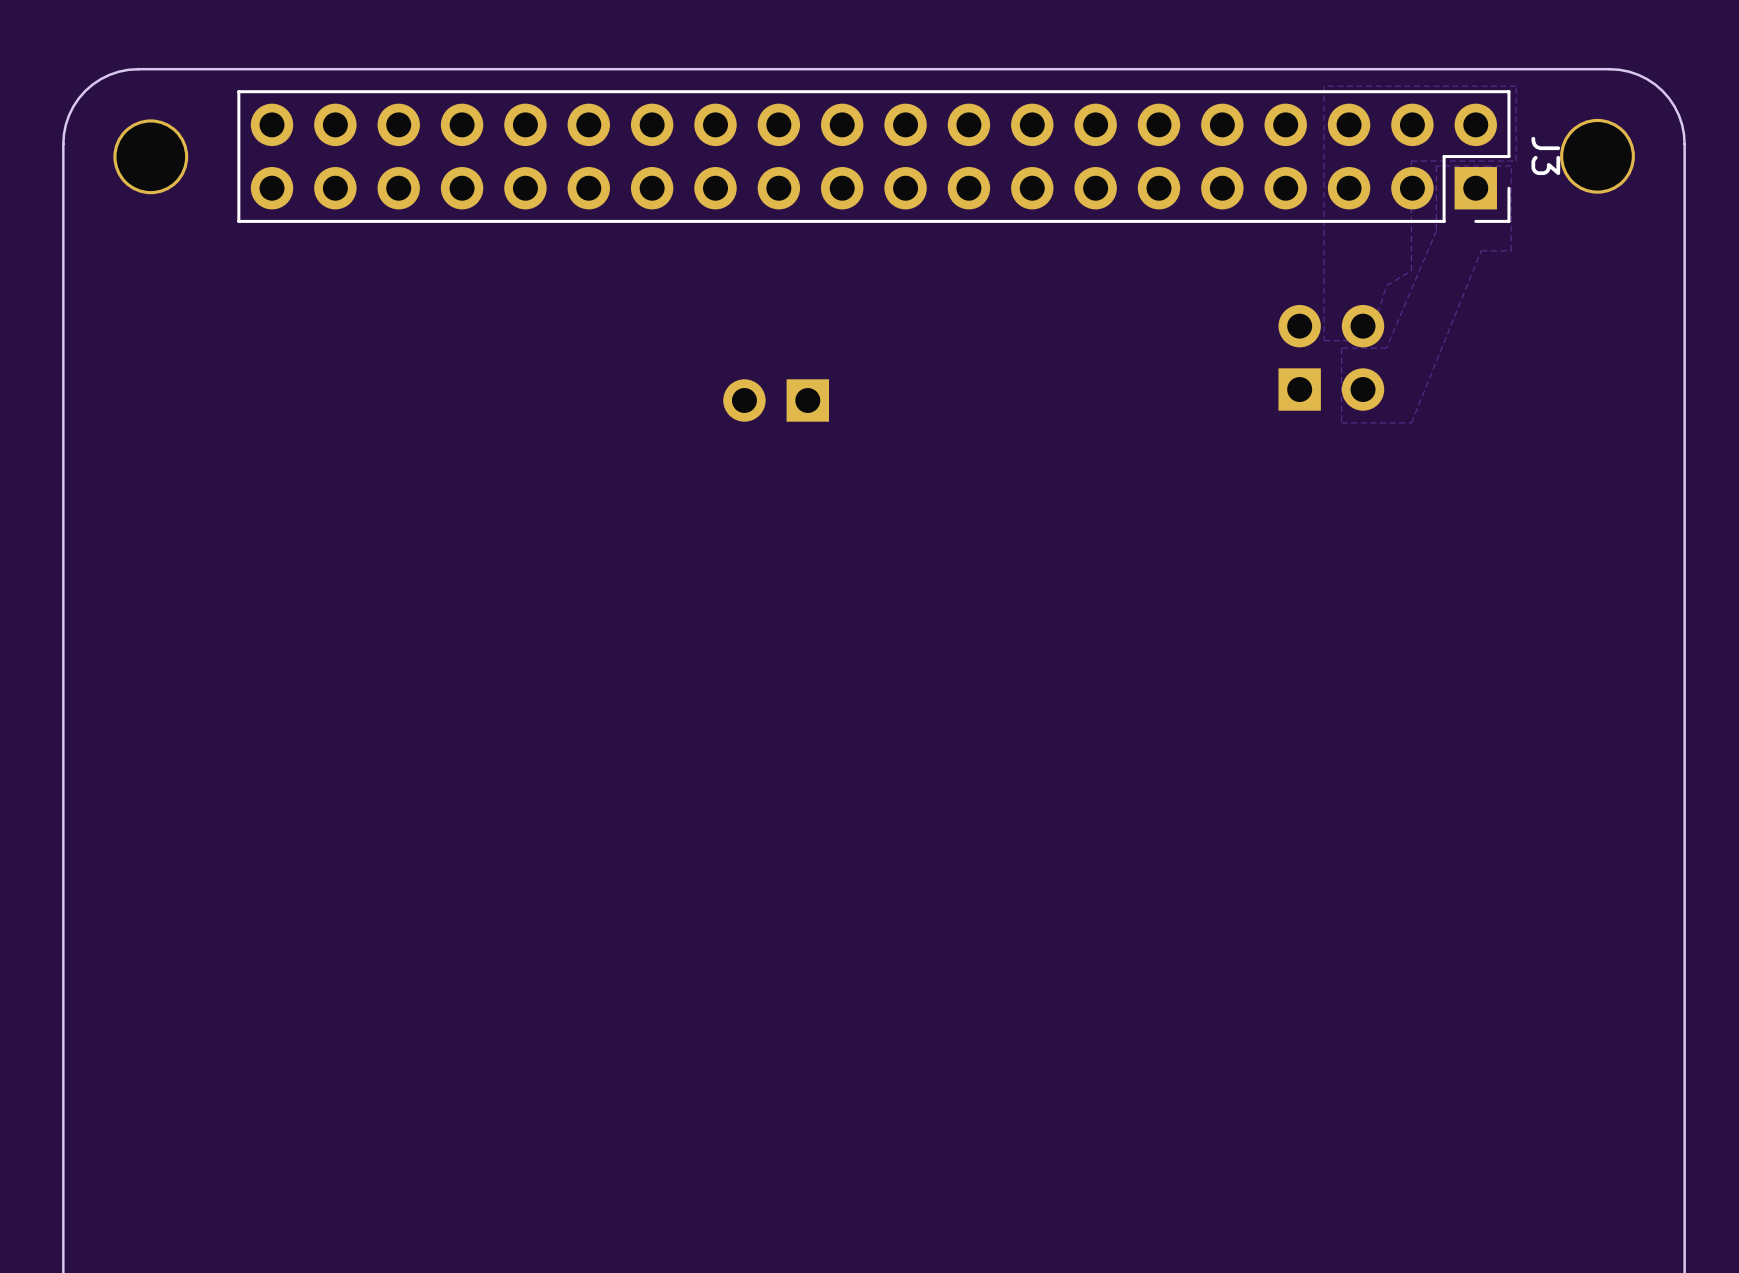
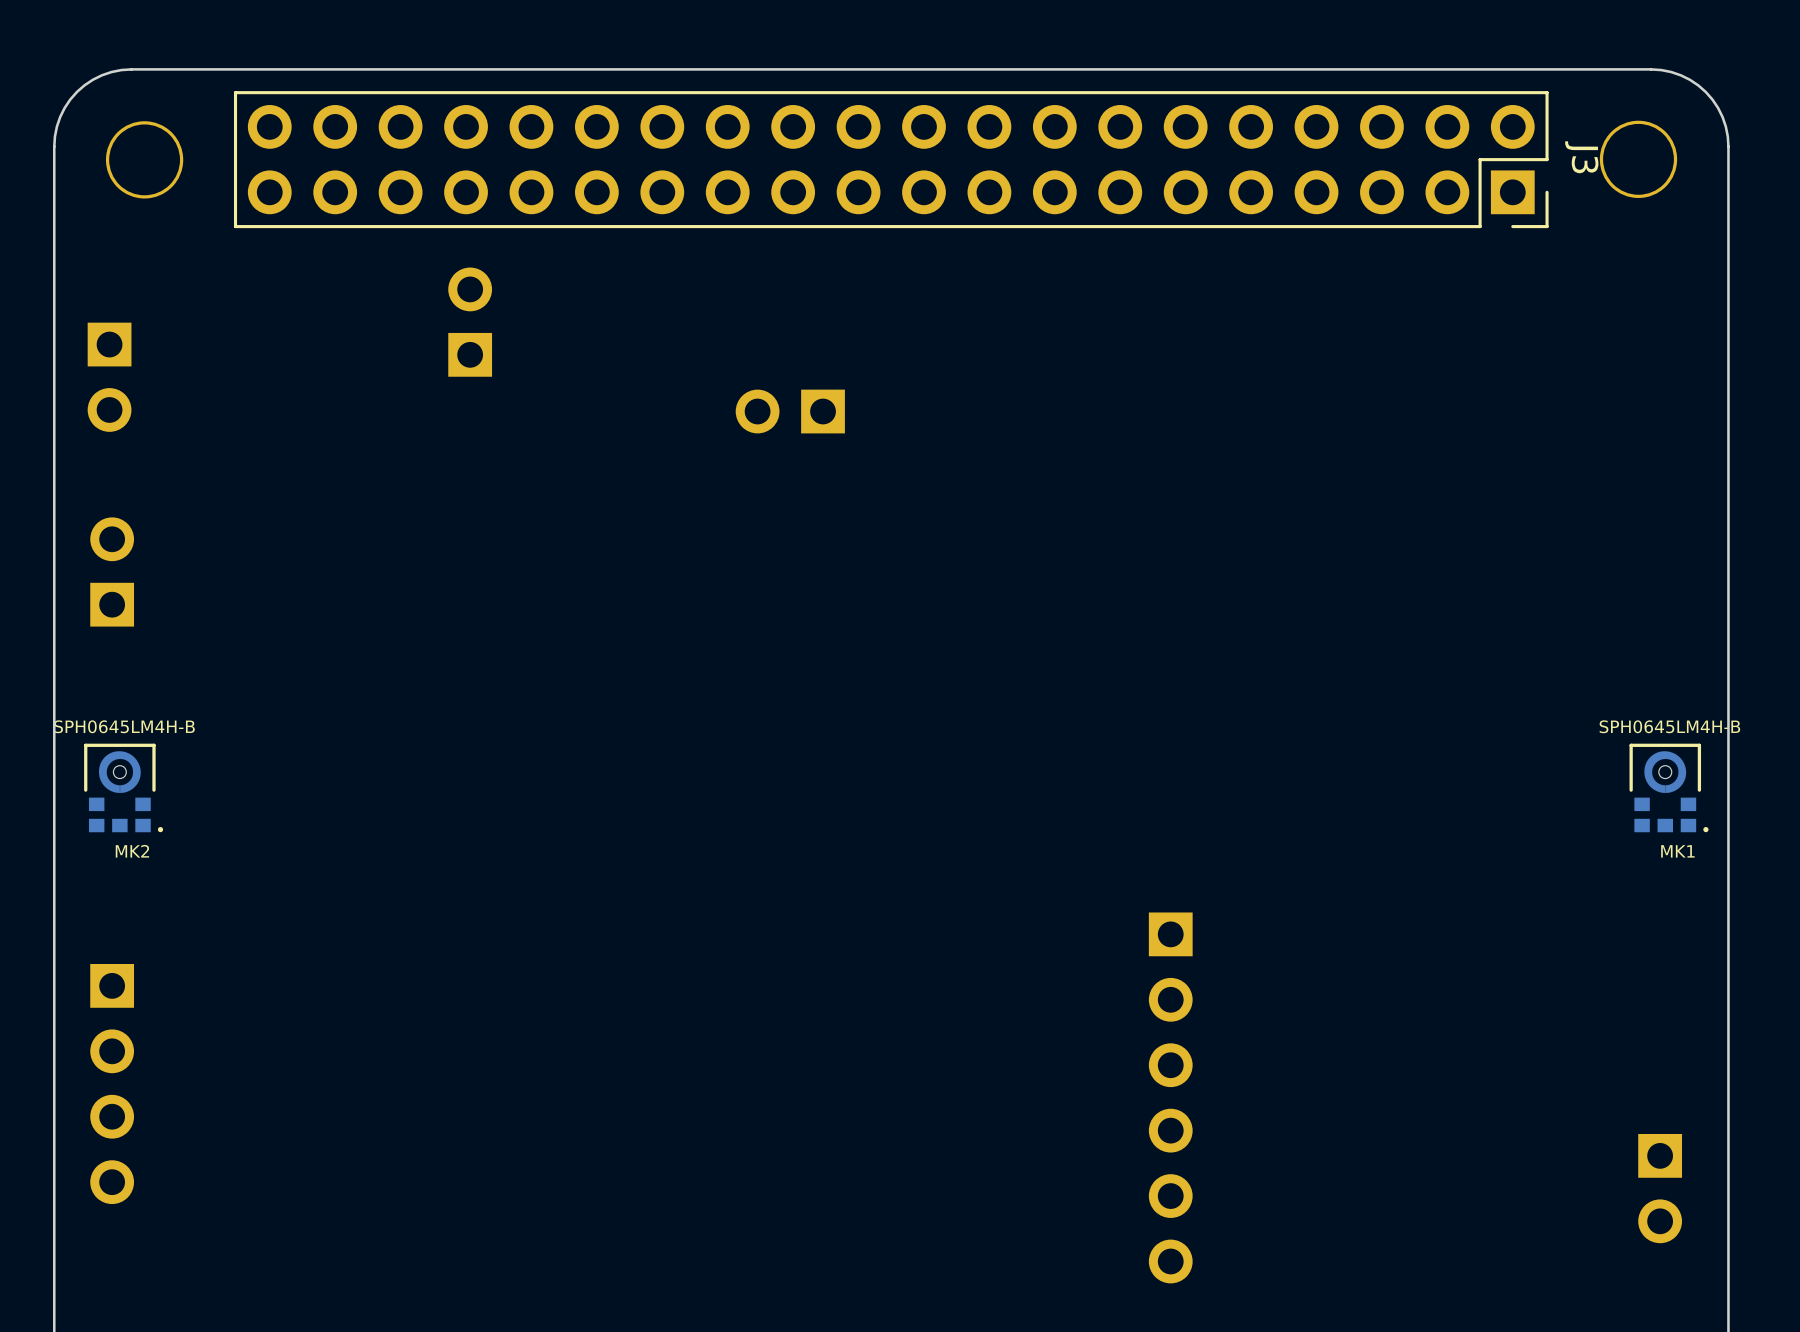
zone outline: (1516, 86) (1516, 161) (1411, 161) (1411, 270) (1386, 285) (1369, 340) (1324, 340) (1324, 86) (1516, 86) -> none
zone outline: (1511, 166) (1511, 250) (1481, 250) (1411, 422) (1341, 422) (1341, 348) (1386, 348) (1436, 230) (1436, 166) (1511, 166) -> none
part: none -> (470, 322)
part: (1331, 357) -> none
part: none -> (109, 377)
part: none -> (112, 571)
MK2: none -> SPH0645LM4H-B (123, 787)
MK1: none -> SPH0645LM4H-B (1669, 787)
part: none -> (112, 1084)
part: none -> (1170, 1097)
part: none -> (1660, 1188)

